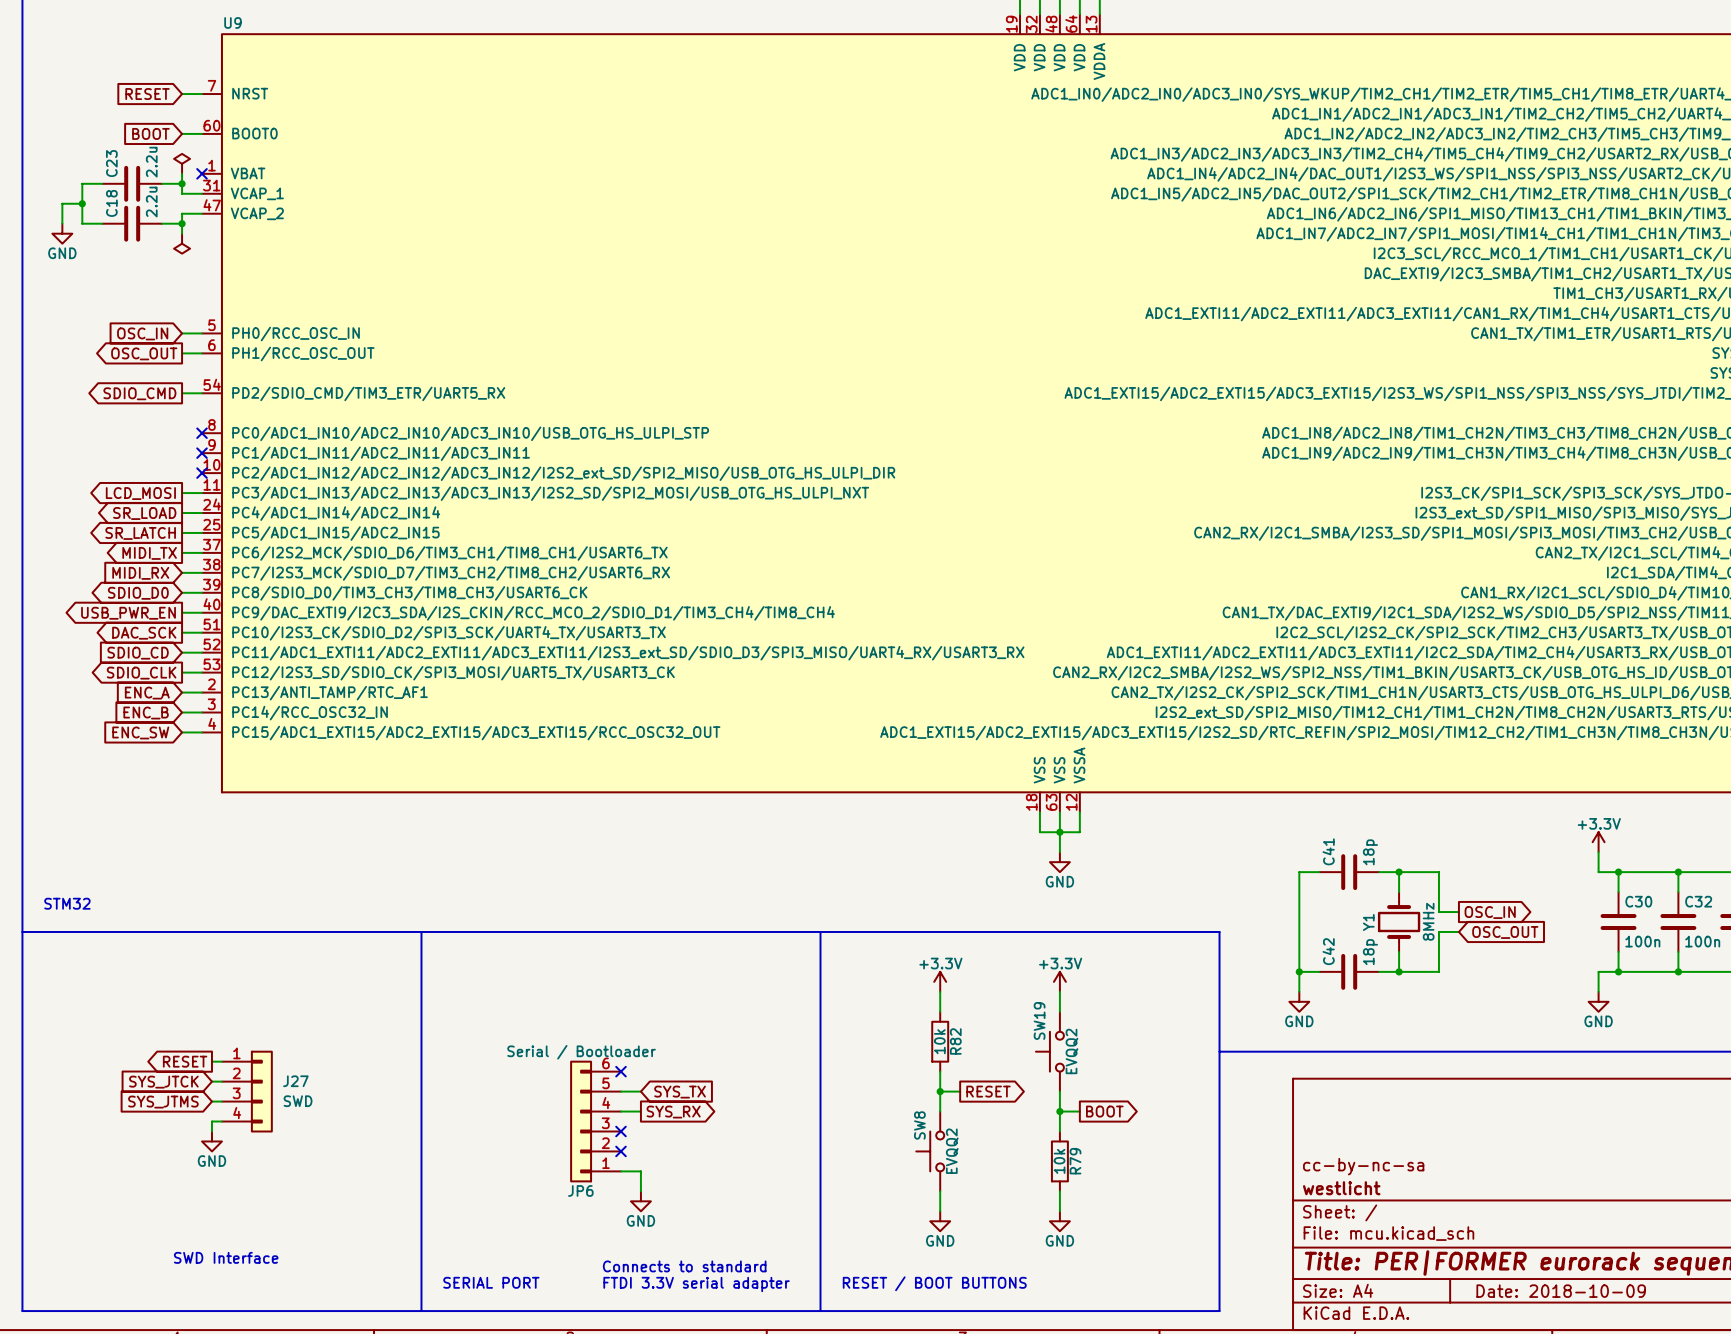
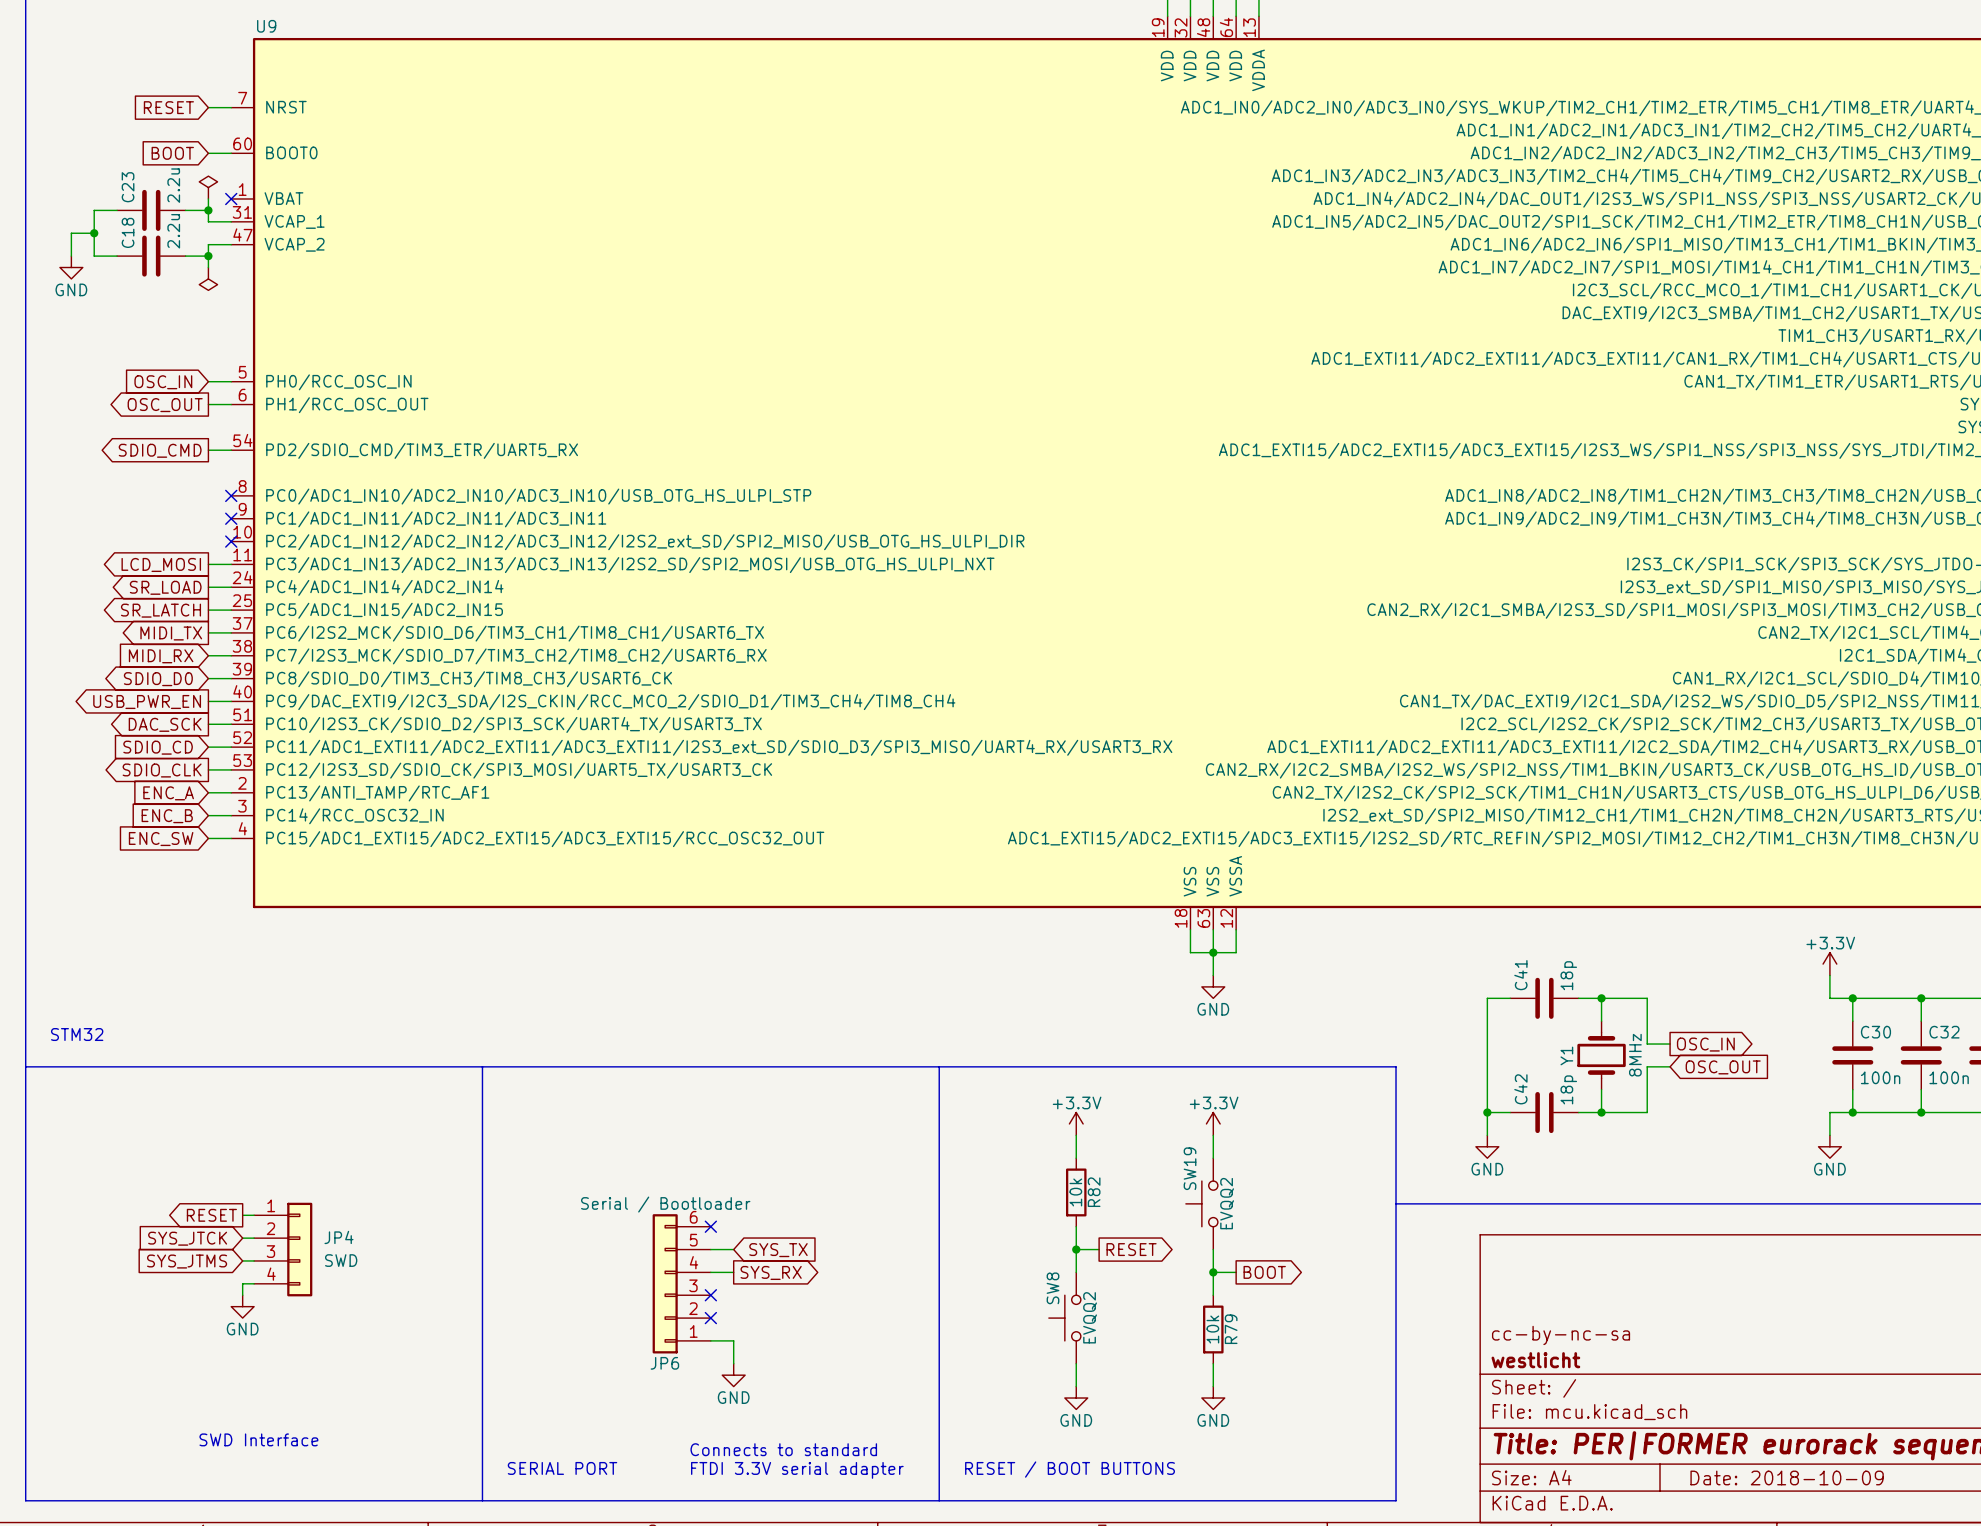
J27 name: J27 (295, 1081) -> JP4 (339, 1237)

